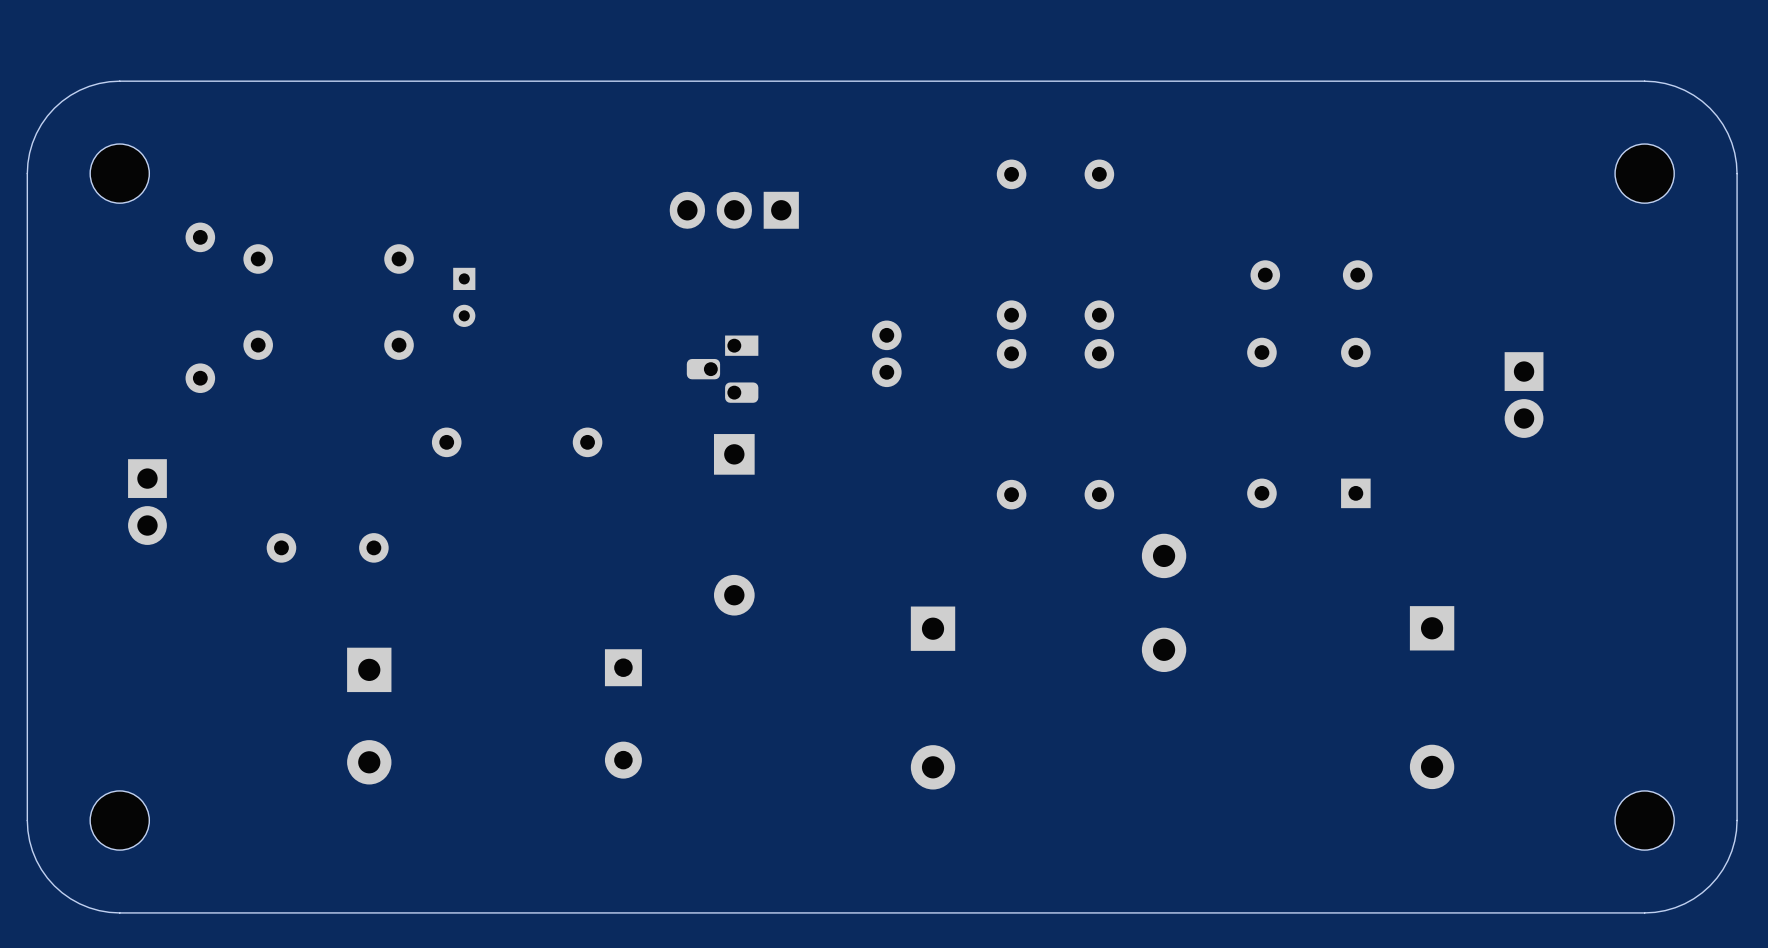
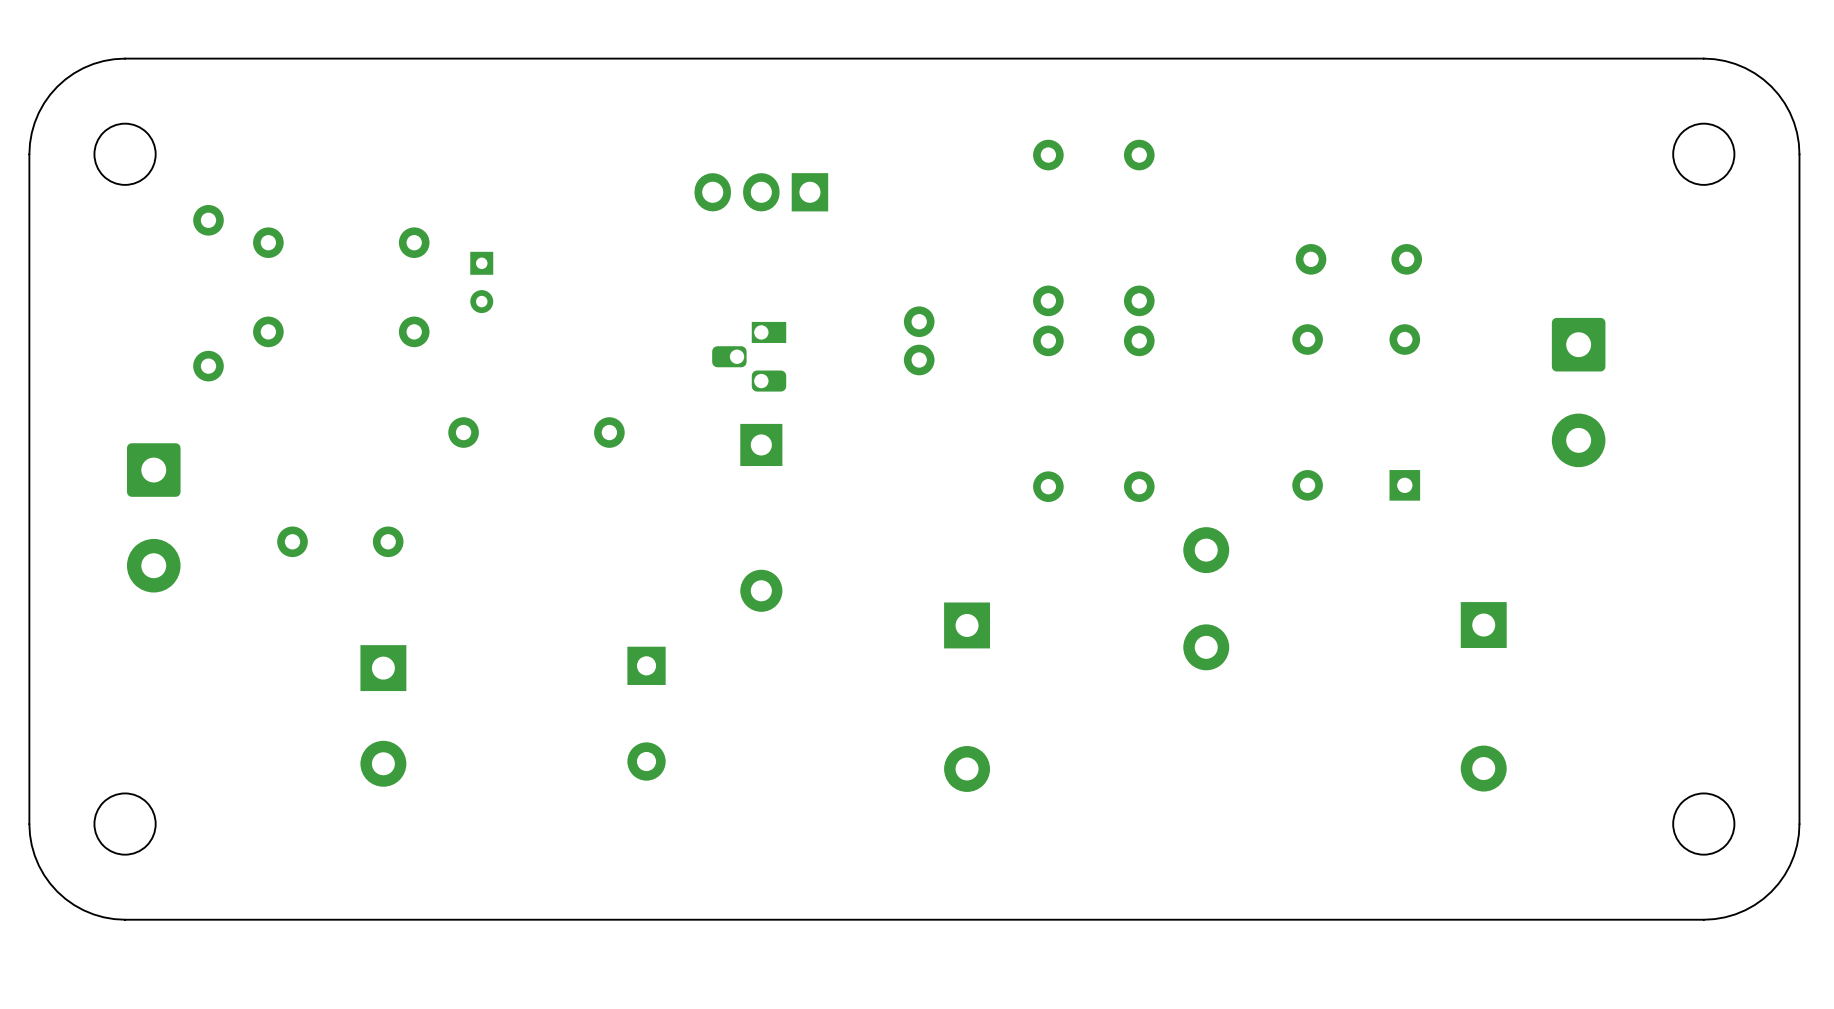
part footprint: [1504, 352, 1544, 438] -> [1551, 317, 1606, 468]
part: (147, 502) -> none
part: none -> (153, 517)

